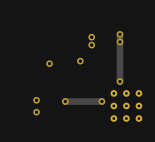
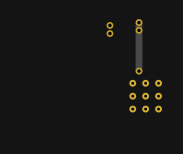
via: (80, 61) -> none
via: (49, 63) -> none
via: (36, 100) -> none
via: (65, 101) -> none
track: (101, 101) (65, 101) -> none
via: (101, 101) -> none
via: (36, 112) -> none

